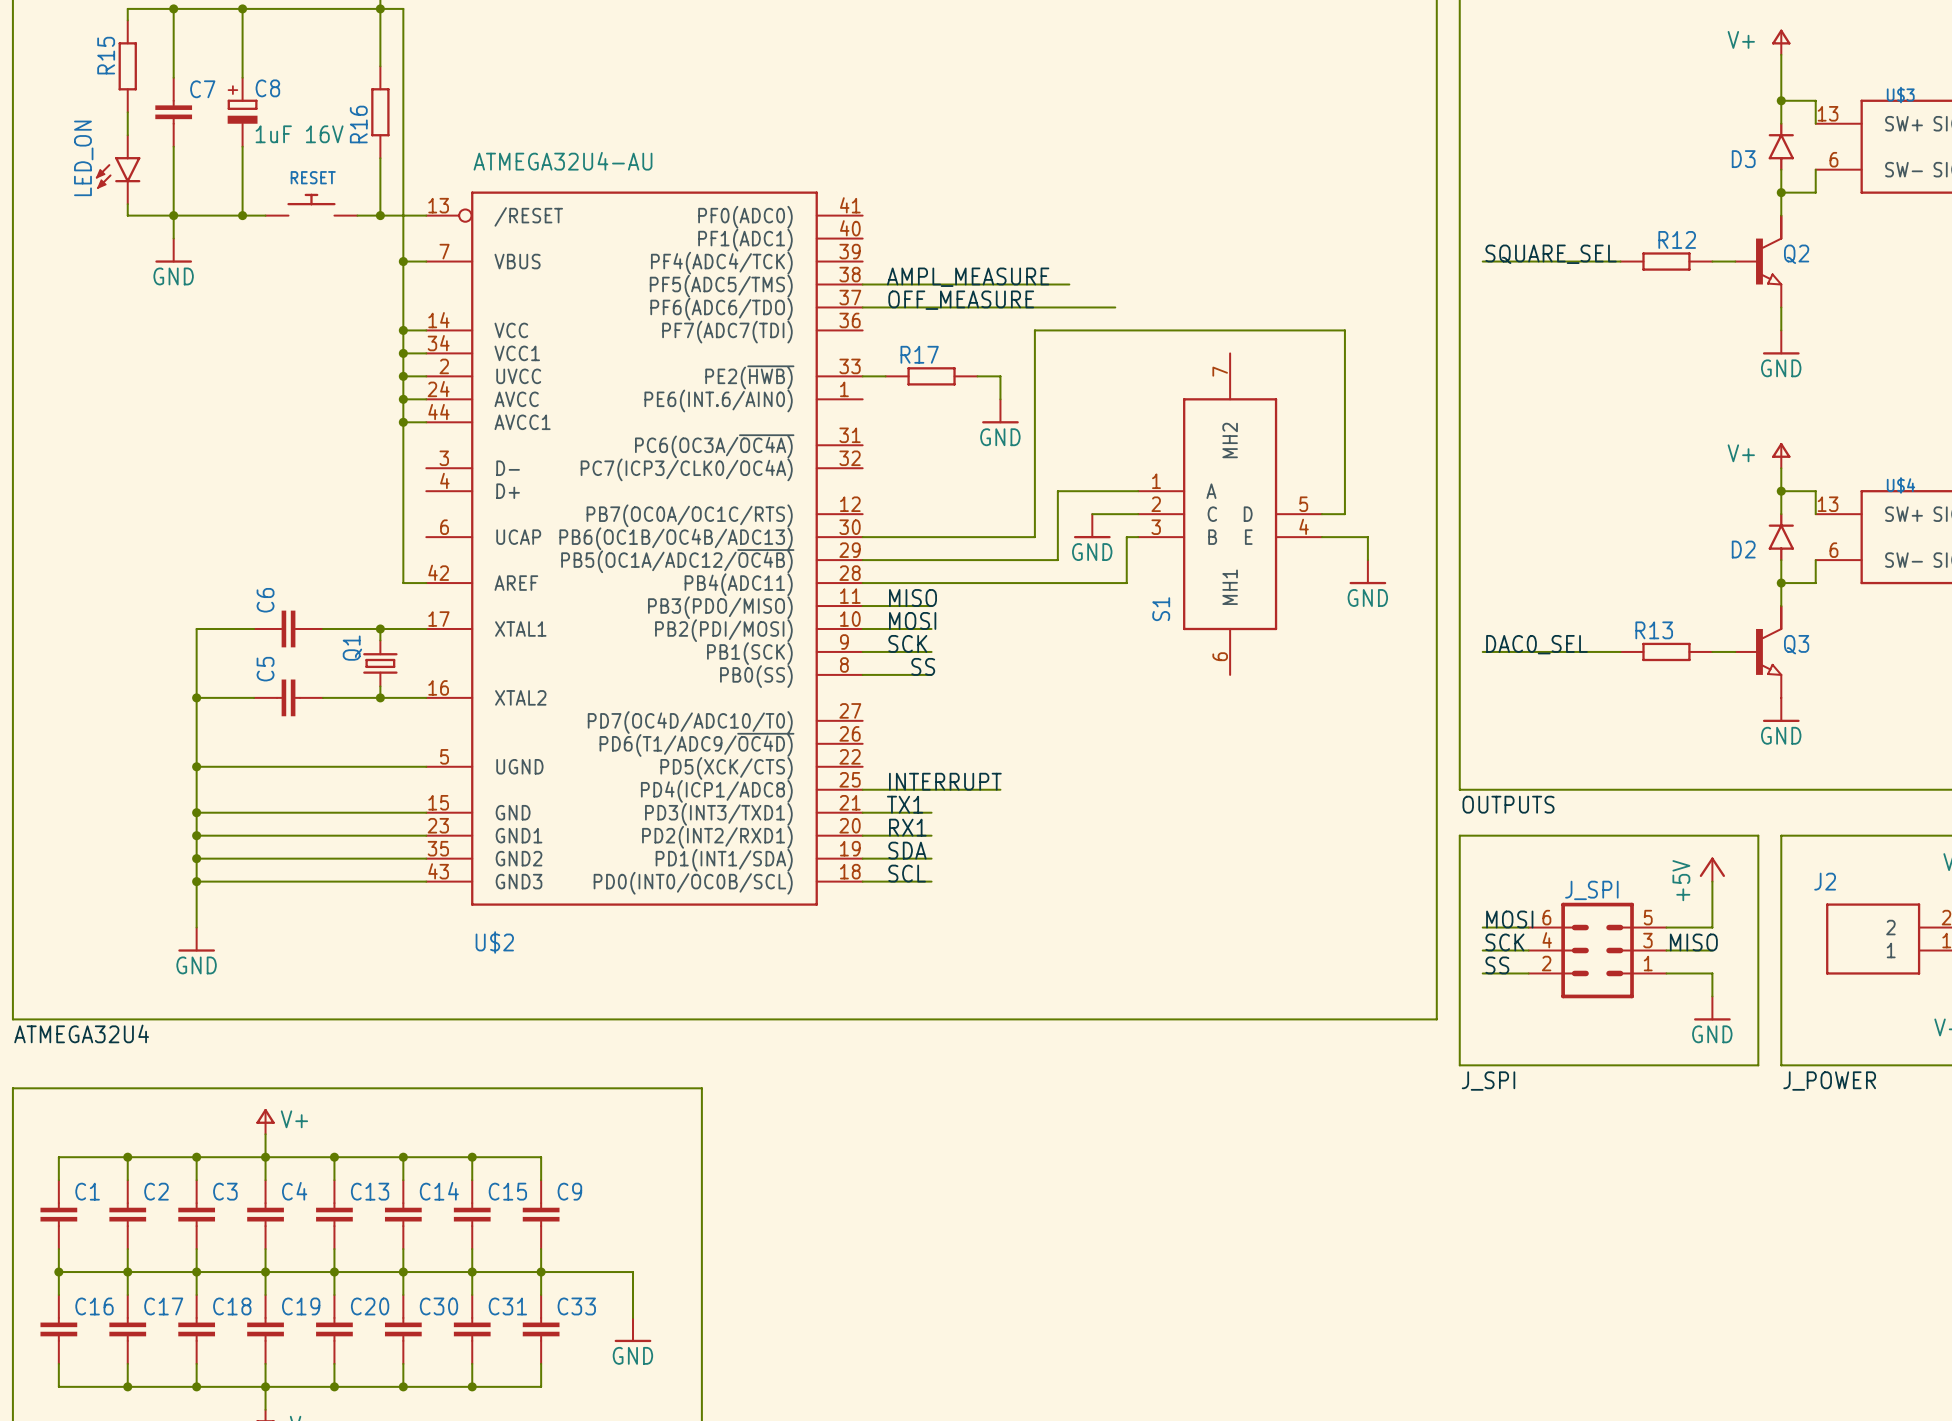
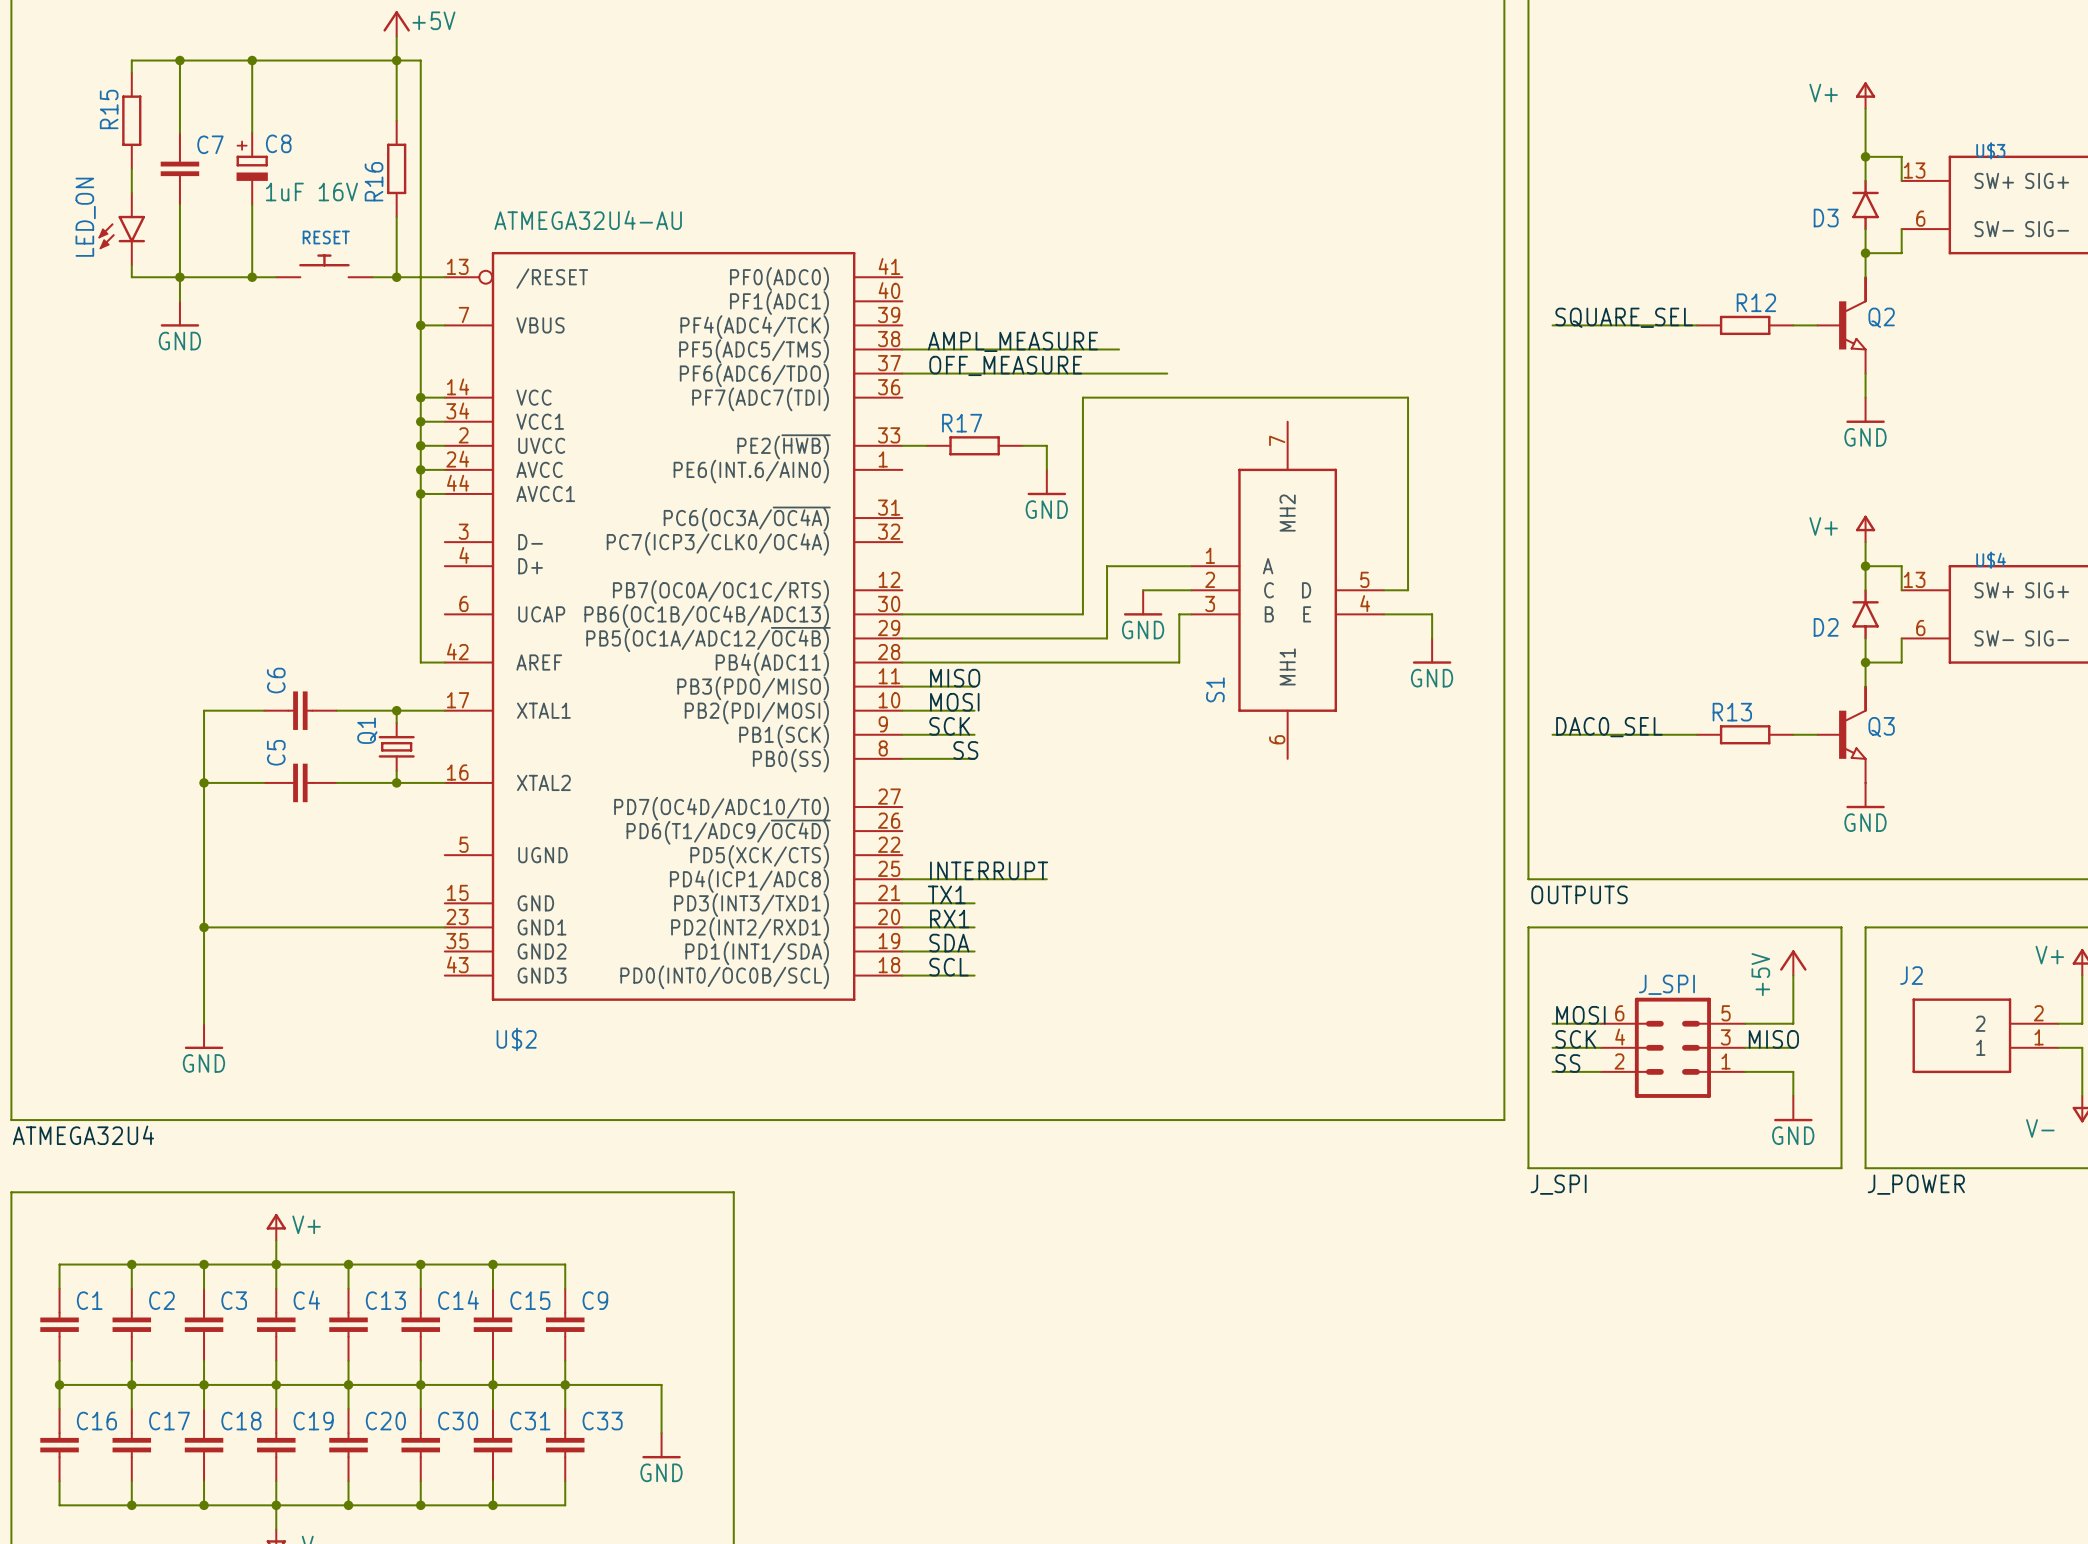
wire: (196, 766) (426, 766) -> none
junction: (196, 766) -> none
wire: (196, 812) (426, 812) -> none
junction: (196, 812) -> none
wire: (196, 858) (426, 858) -> none
junction: (196, 858) -> none
wire: (196, 881) (426, 881) -> none
junction: (196, 881) -> none

